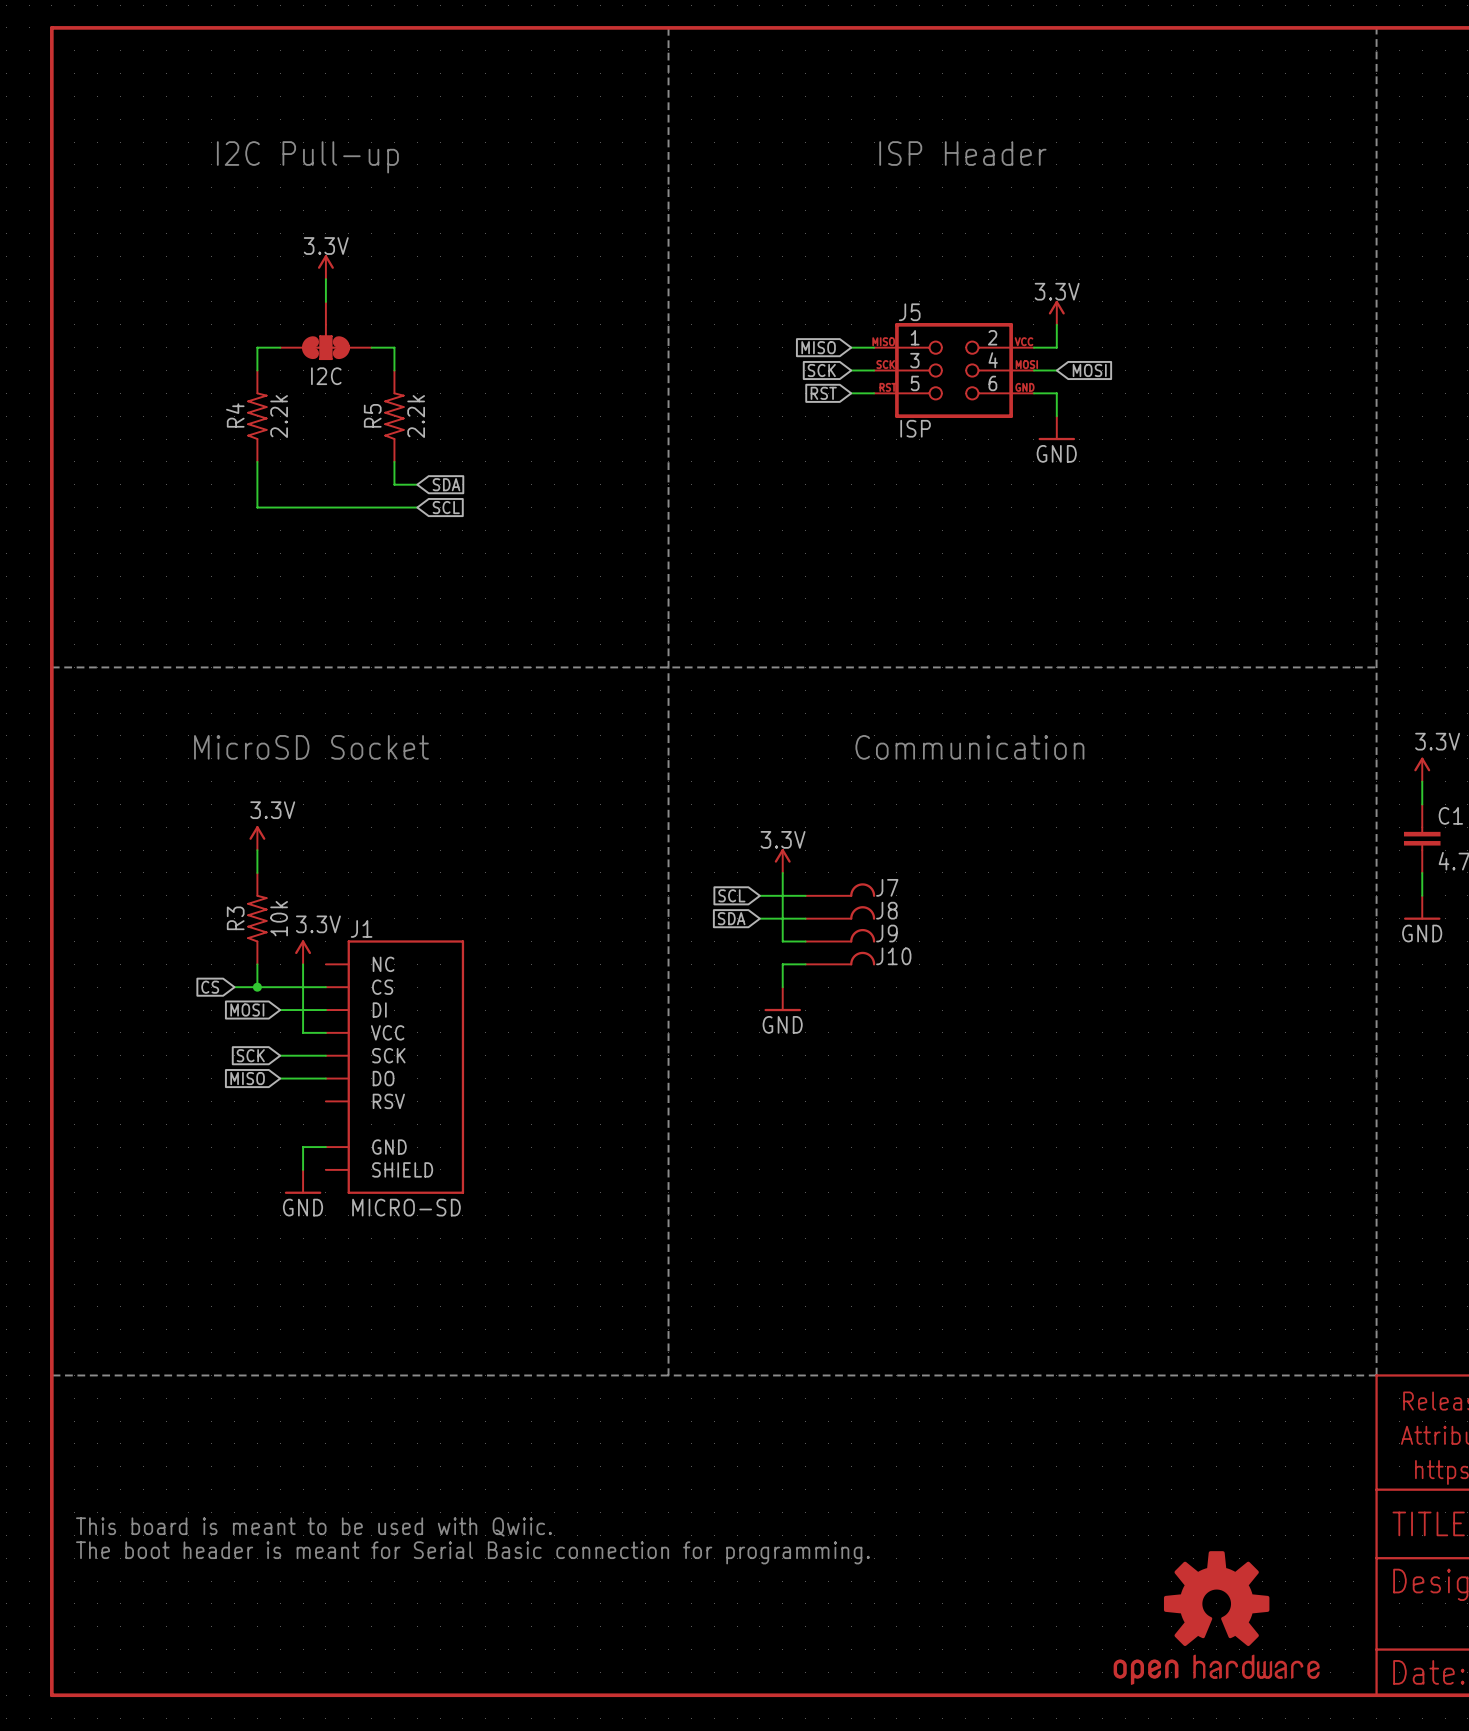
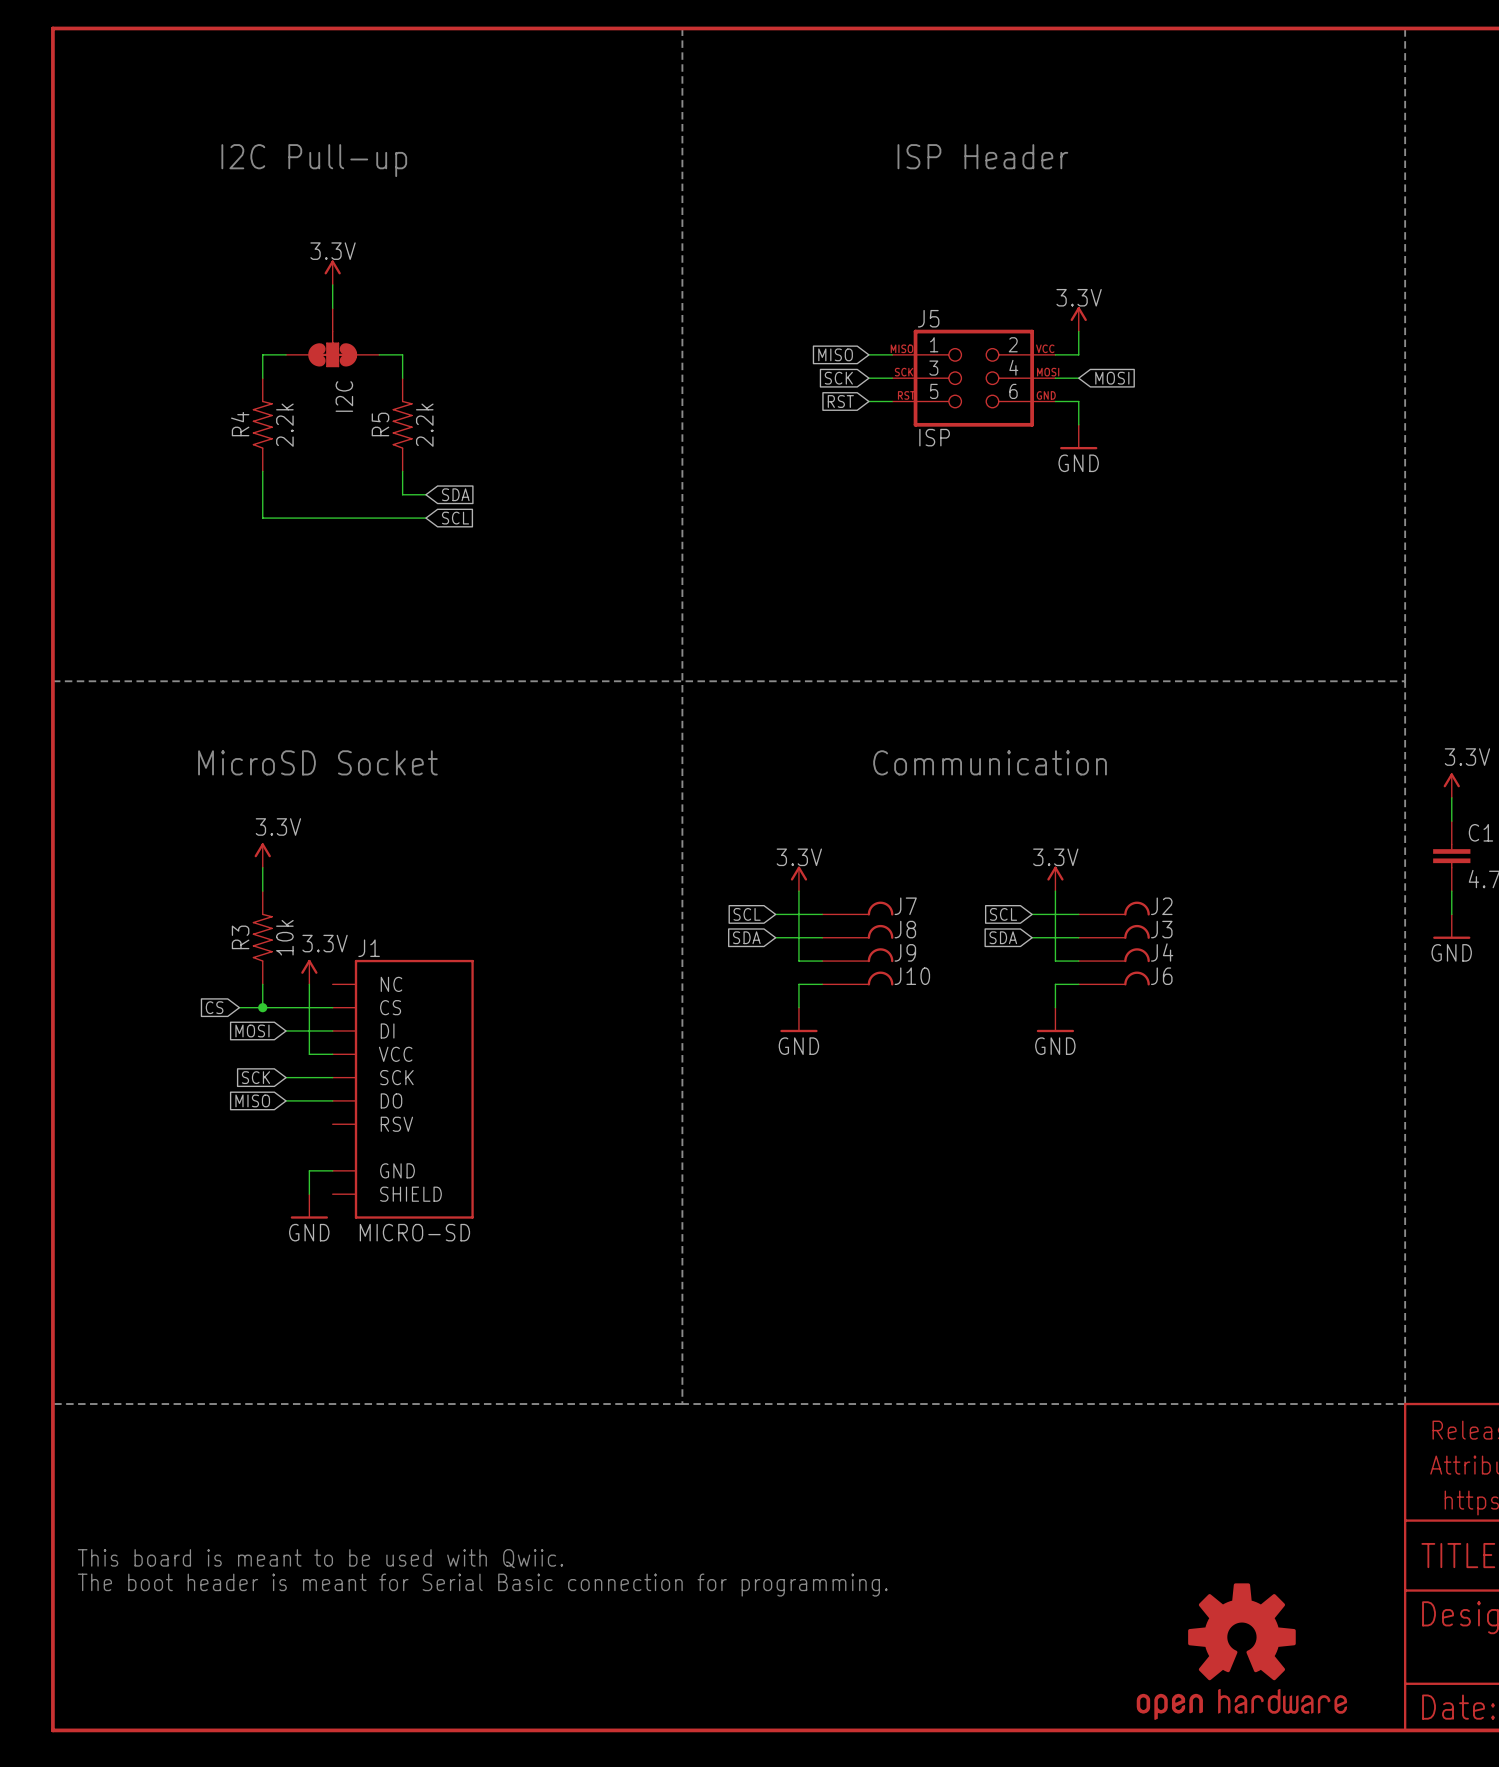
I2C name rotation: 0° (326, 376) -> 90° counterclockwise (344, 396)
power symbol: none -> 3.3V (1055, 878)
wire: none -> (1055, 891) (1055, 961) (1078, 961)
J2: none -> (1114, 908)
global label: none -> SCL (1003, 914)
wire: none -> (1032, 914) (1078, 914)
J3: none -> (1114, 931)
global label: none -> SDA (1003, 937)
wire: none -> (1032, 937) (1078, 937)
J4: none -> (1114, 955)
J6: none -> (1114, 978)
wire: none -> (1078, 984) (1055, 984) (1055, 1007)
power symbol: none -> GND (1055, 1019)

